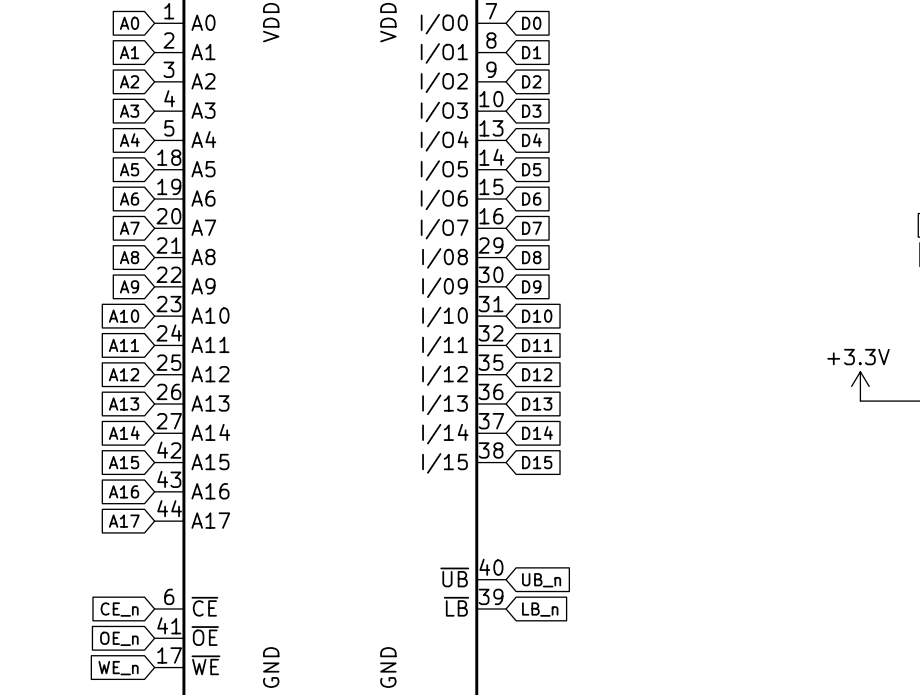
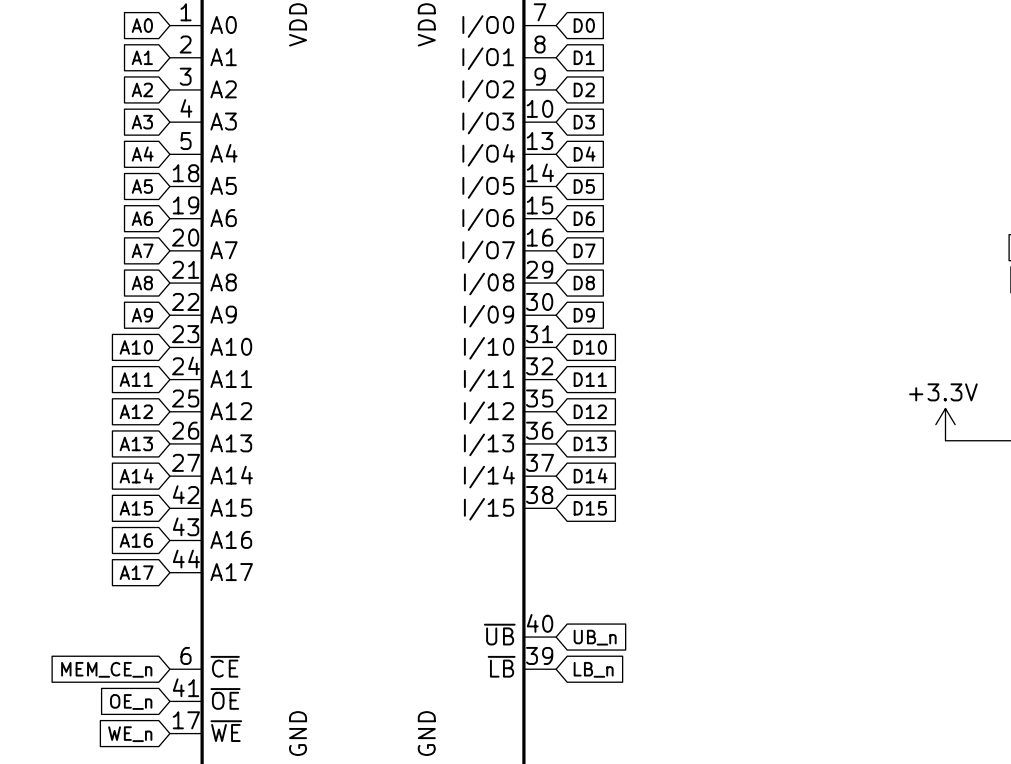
global label: CE_n (119, 609) -> MEM_CE_n (106, 669)

